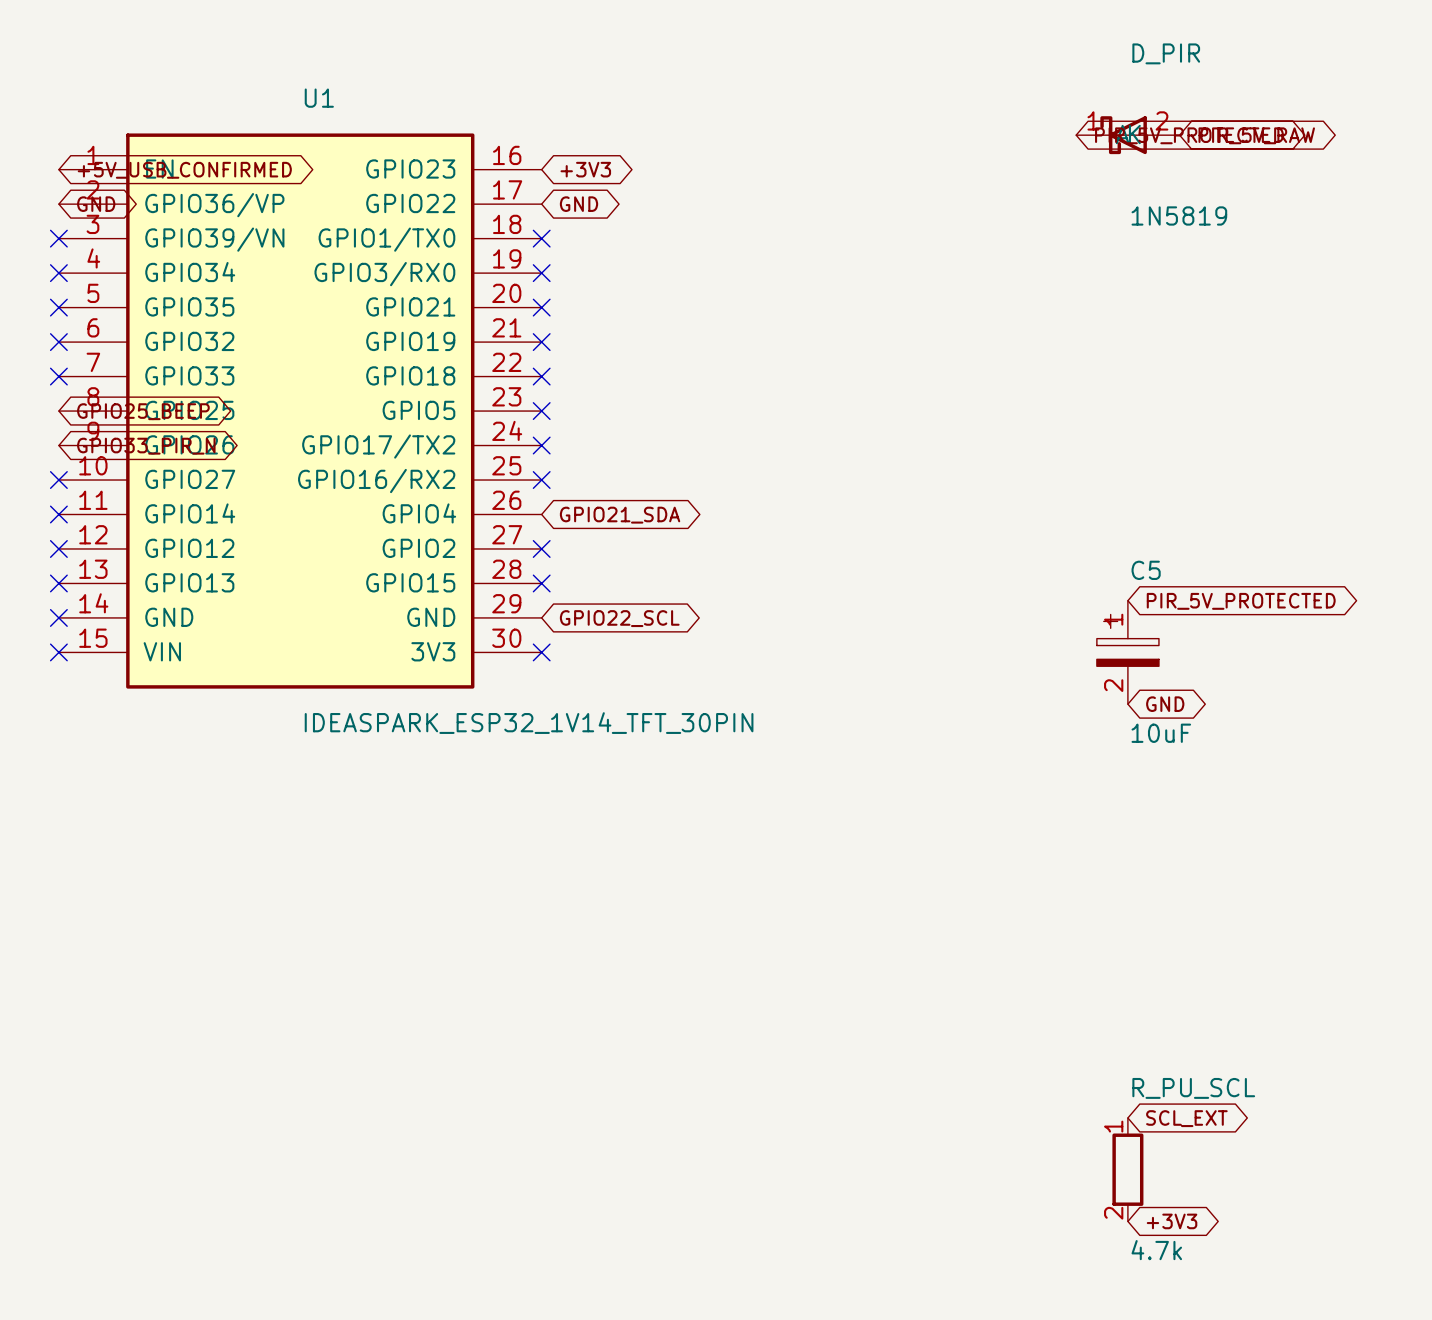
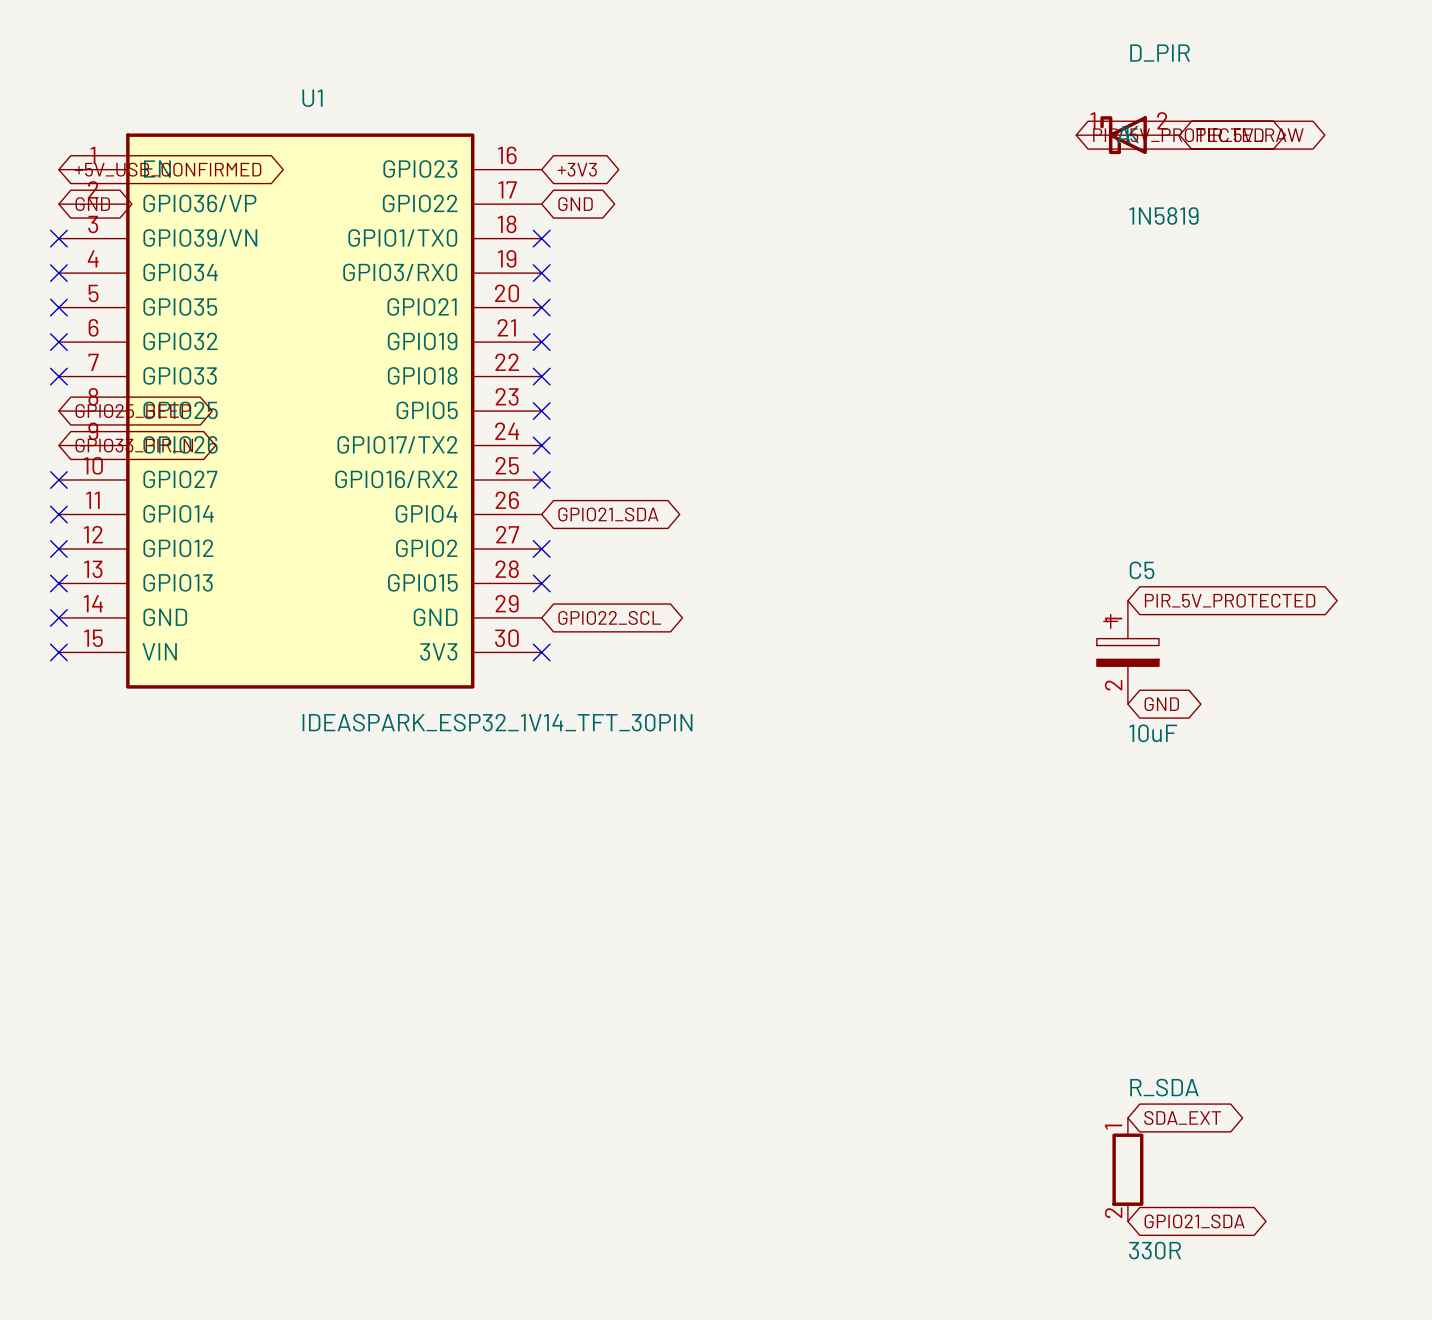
R_PU_SCL name: R_PU_SCL (1193, 1088) -> R_SDA (1164, 1087)
global label: SCL_EXT (1186, 1118) -> SDA_EXT (1182, 1117)
global label: +3V3 (1172, 1221) -> GPIO21_SDA (1194, 1221)
R_PU_SCL value: 4.7k (1156, 1250) -> 330R (1155, 1250)

